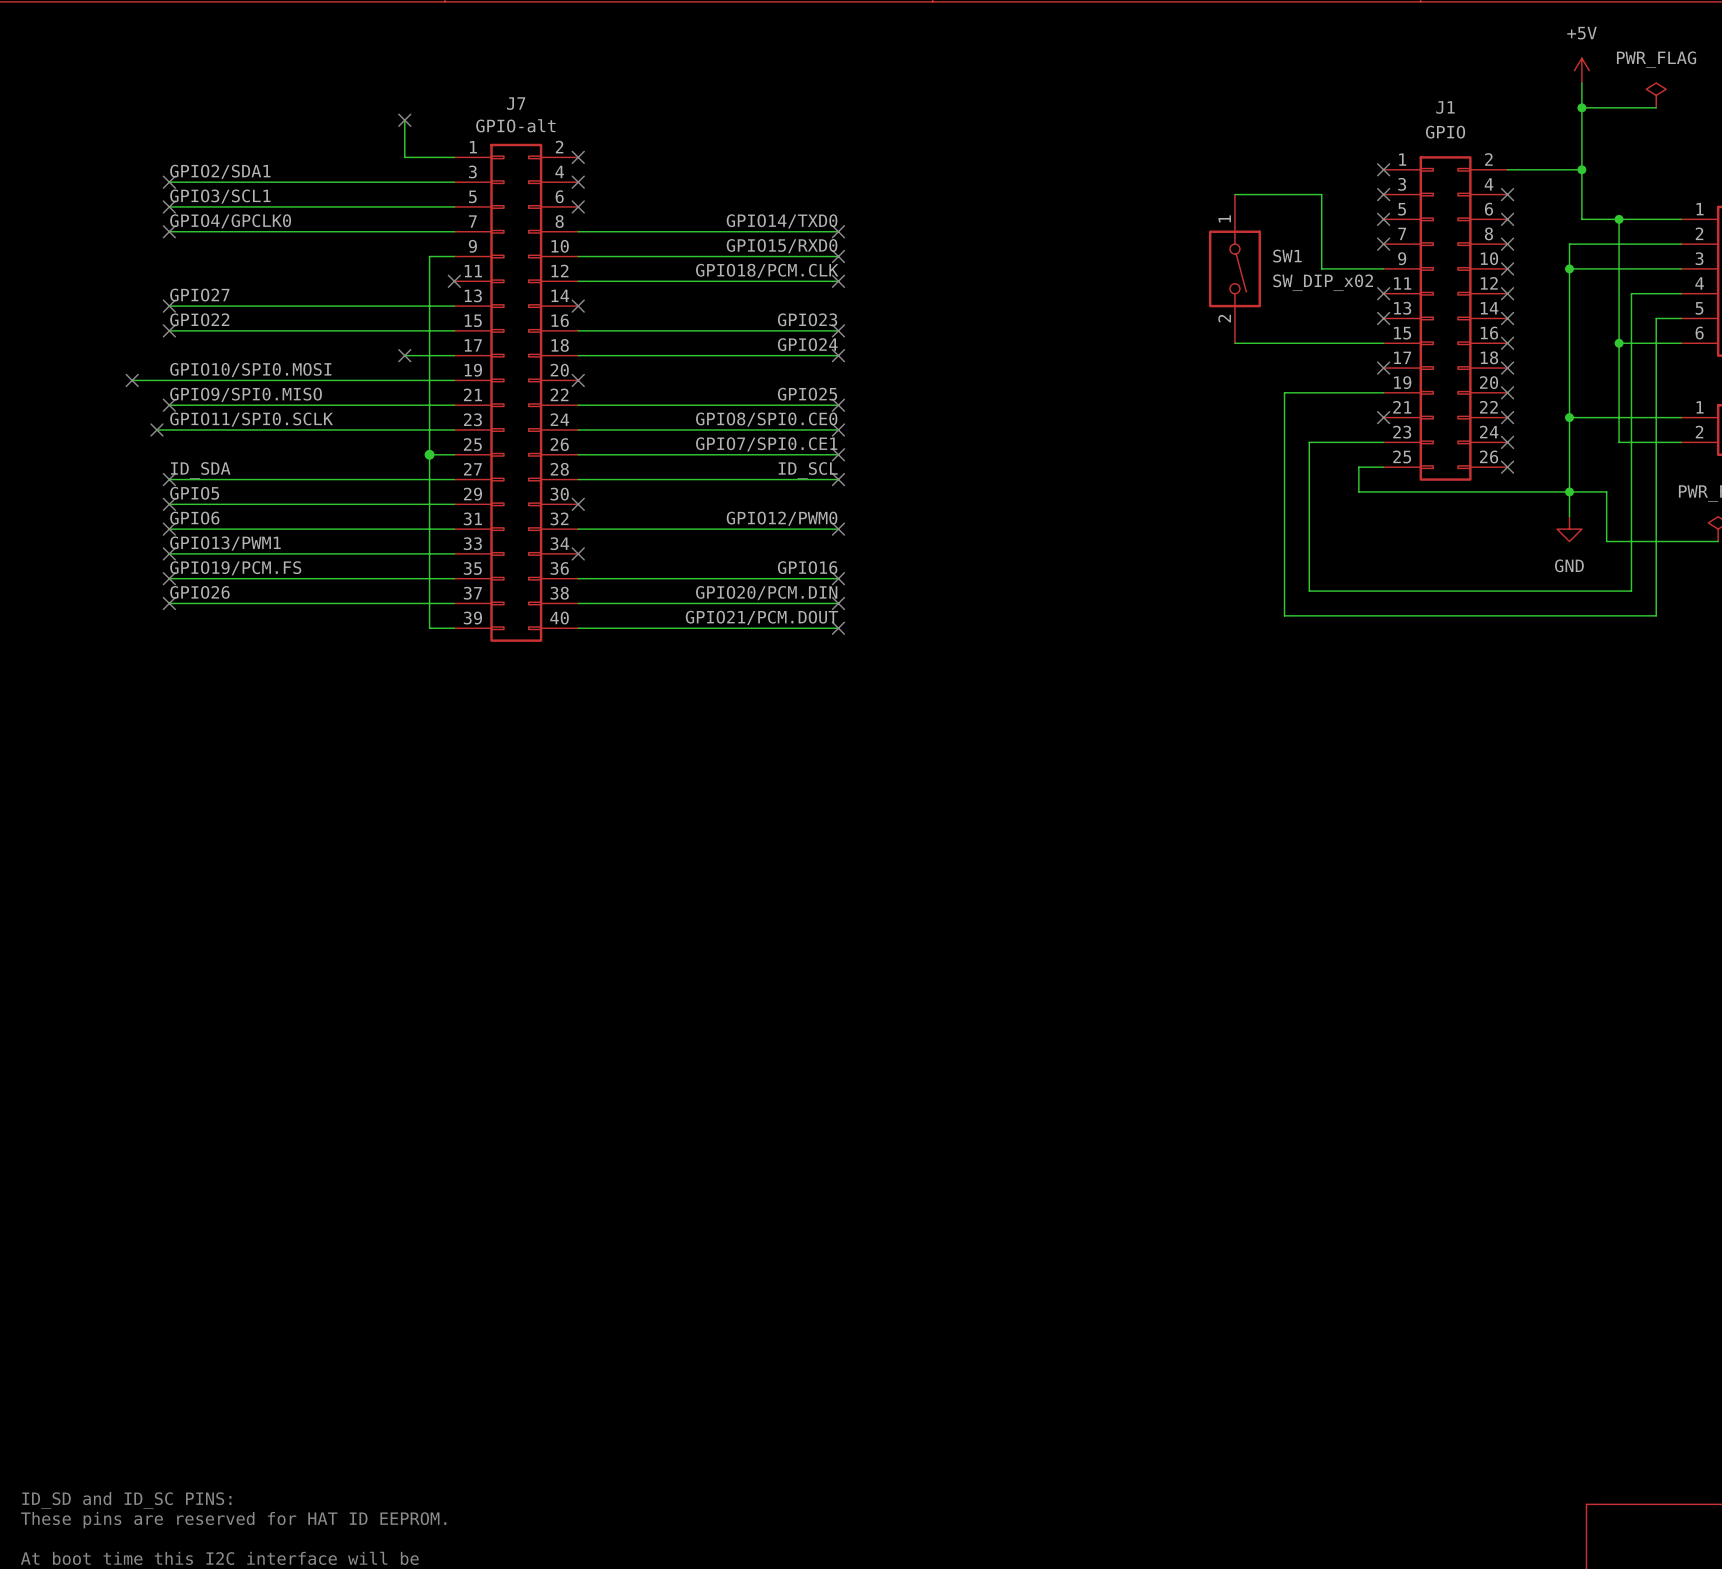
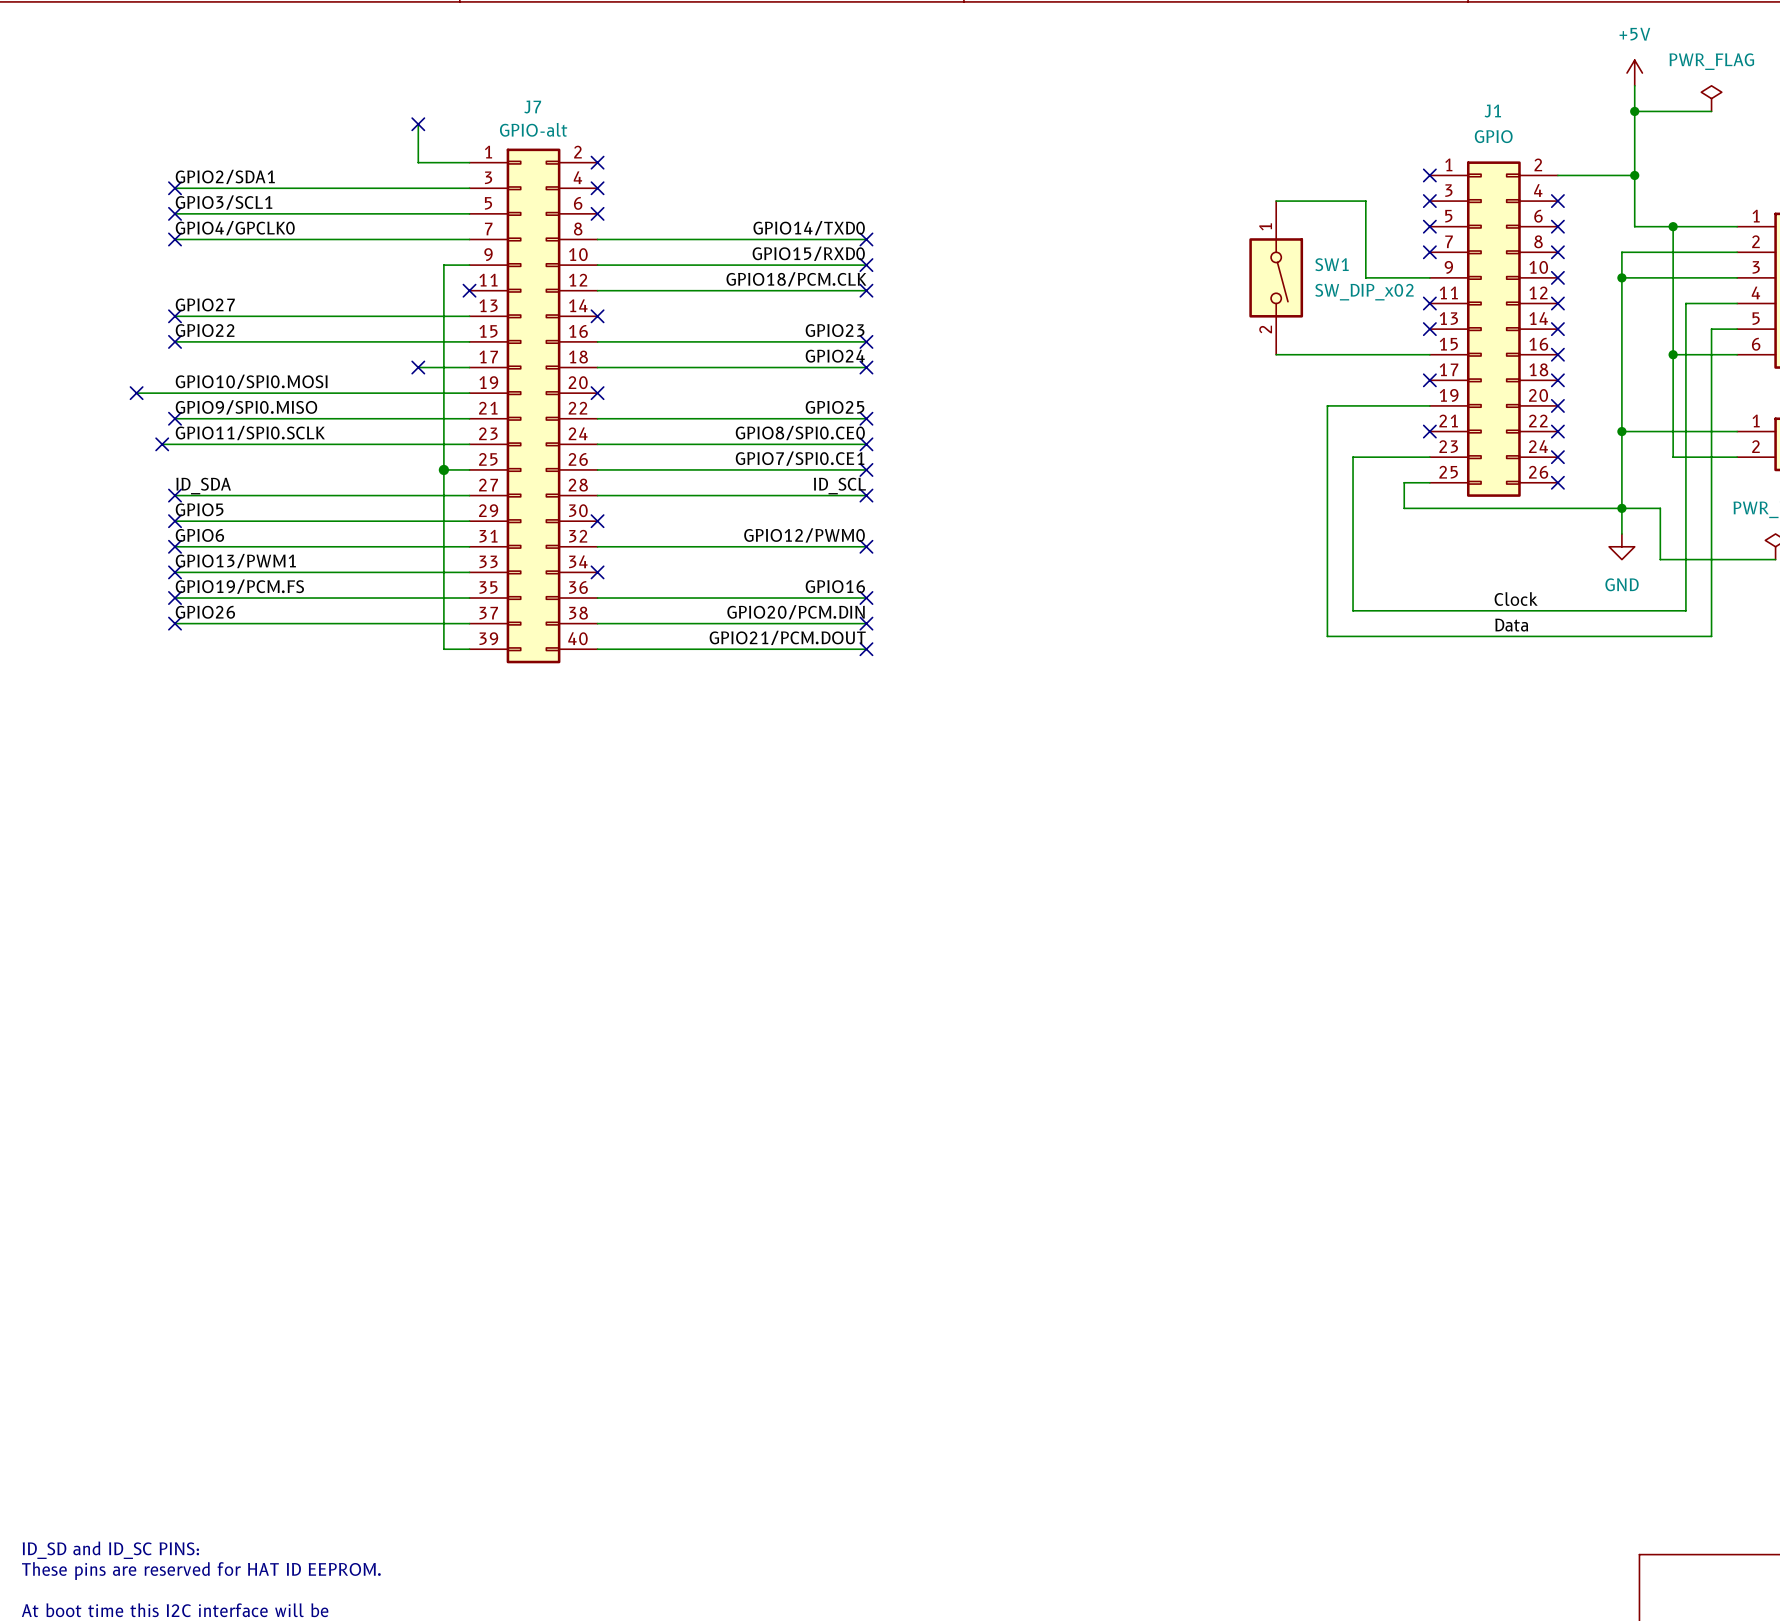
label: none -> Clock (1516, 599)
label: none -> Data (1511, 625)

